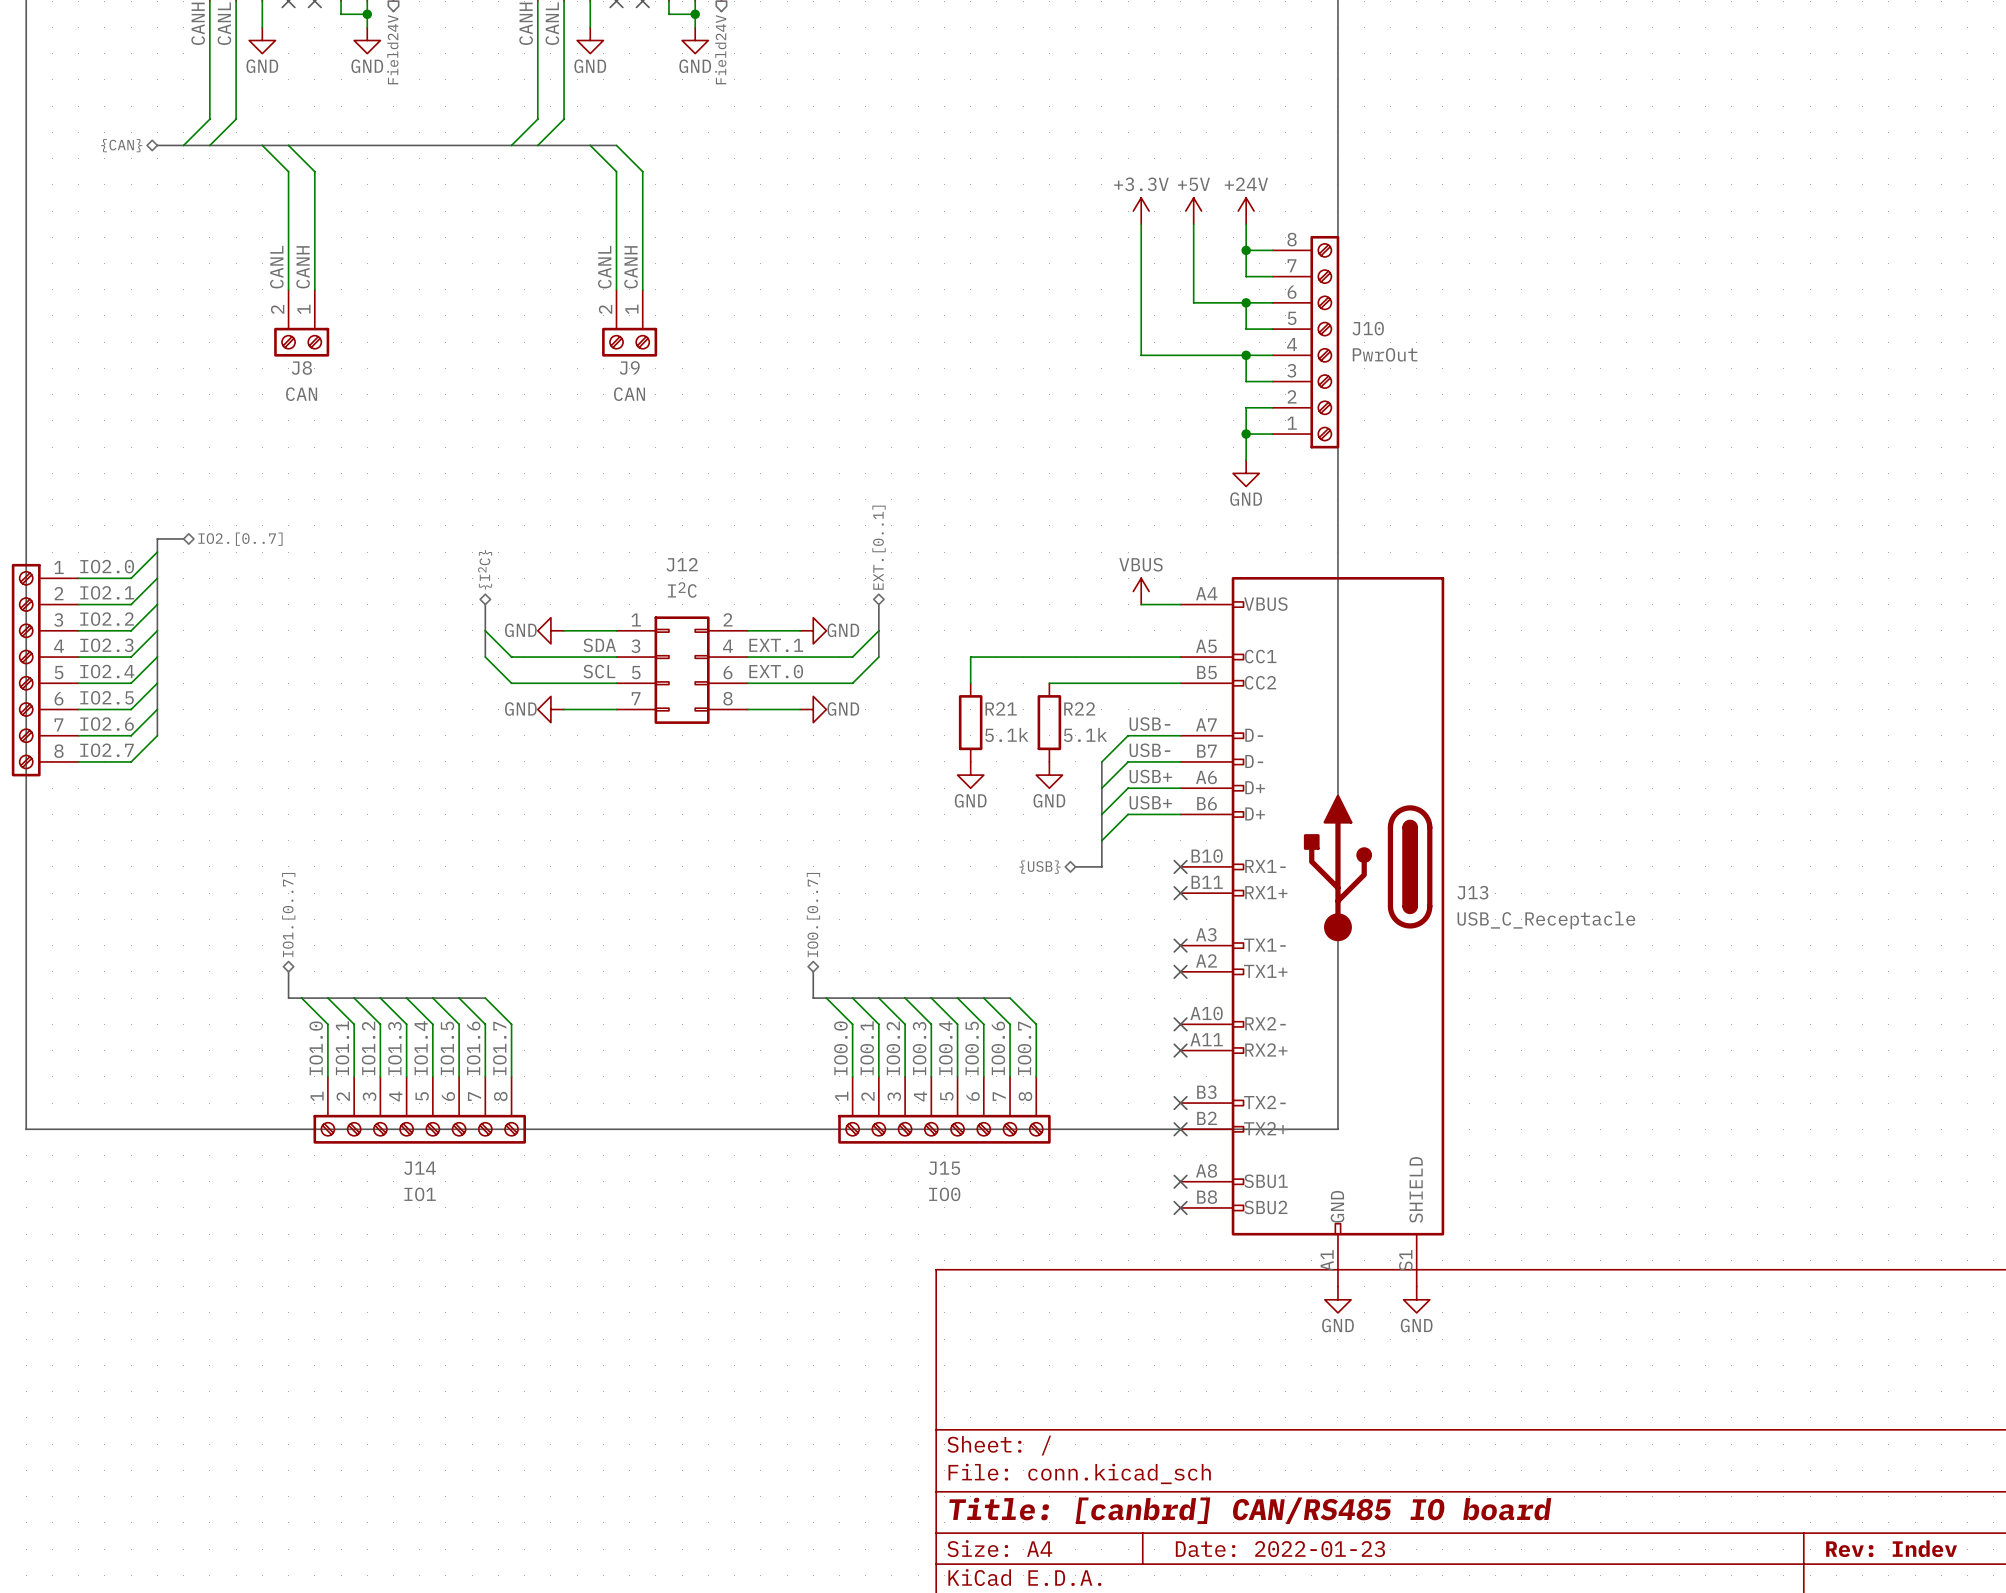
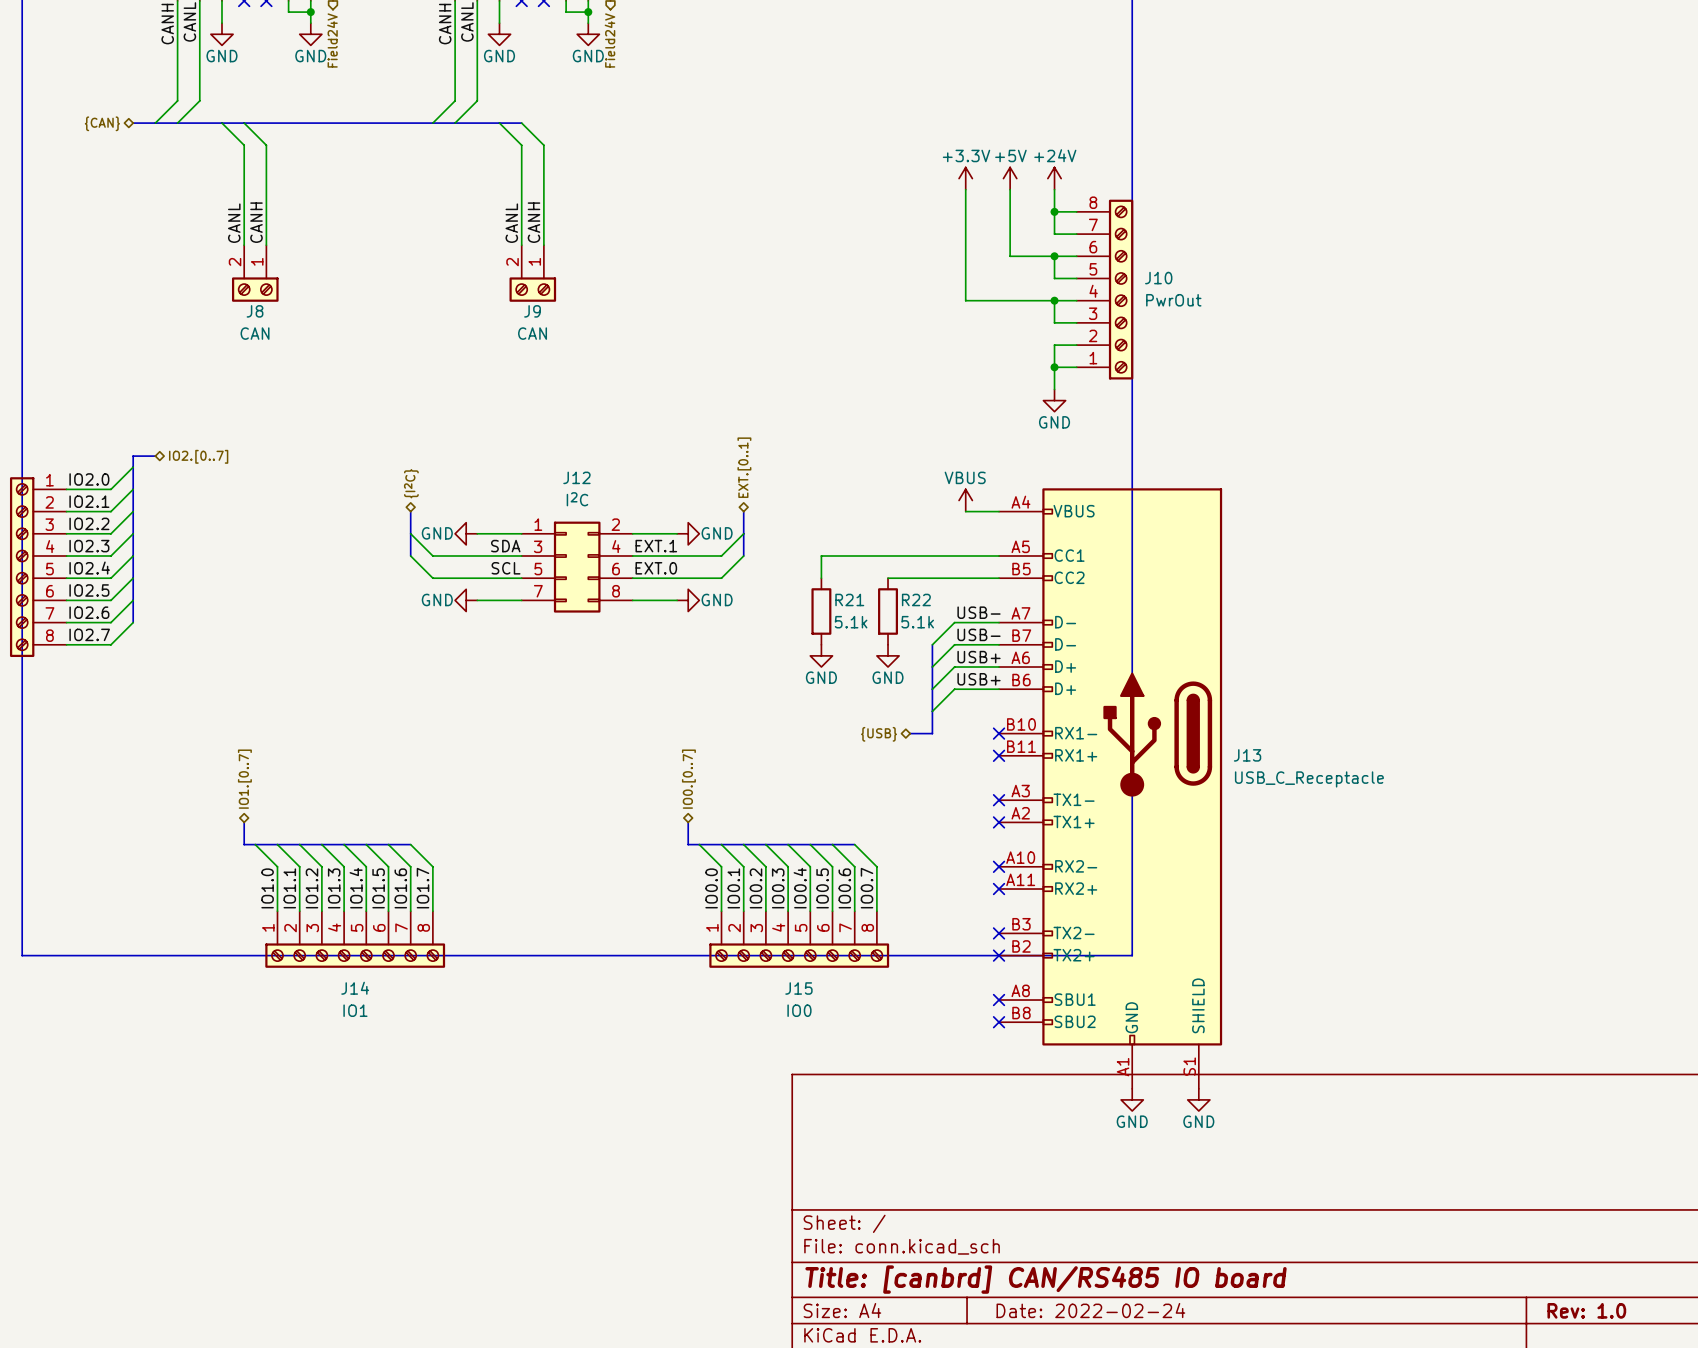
title block: Rev: Indev (1891, 1548) -> Rev: 1.0 (1586, 1310)
title block: Date: 2022-01-23 (1280, 1549) -> Date: 2022-02-24 (1090, 1310)

